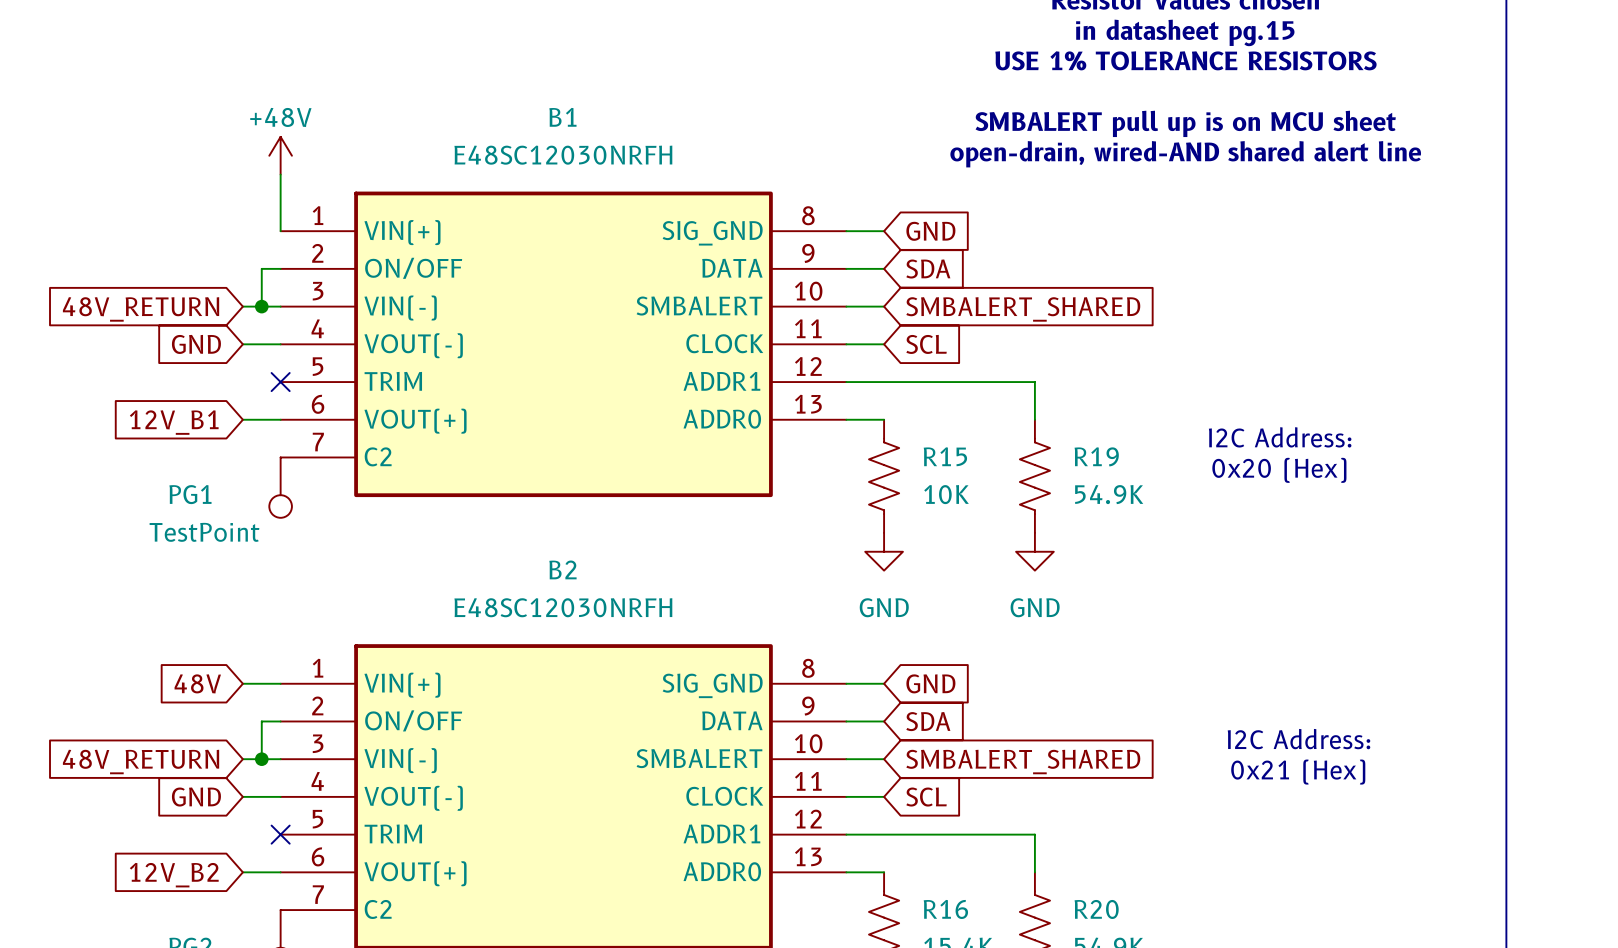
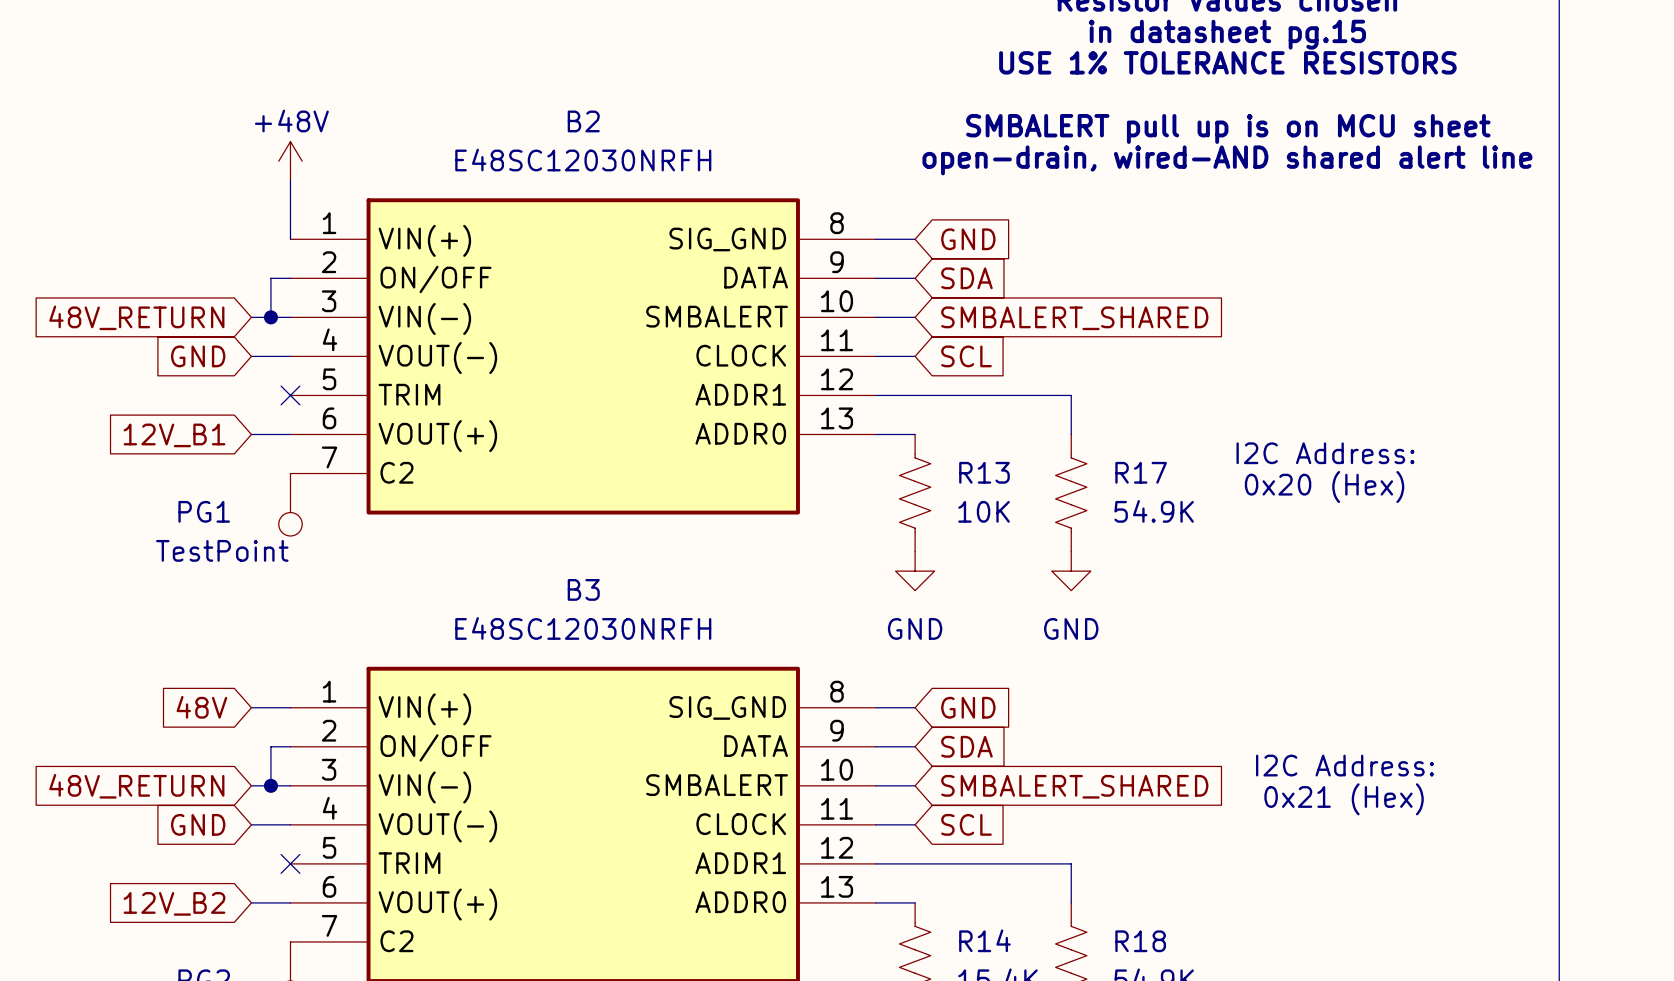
B1 name: B1 (562, 117) -> B2 (583, 121)
R15 name: R15 (945, 456) -> R13 (984, 472)
R19 name: R19 (1096, 456) -> R17 (1141, 472)
B2 name: B2 (562, 569) -> B3 (583, 589)
R16 name: R16 (945, 909) -> R14 (984, 940)
R20 name: R20 (1096, 909) -> R18 (1140, 941)

